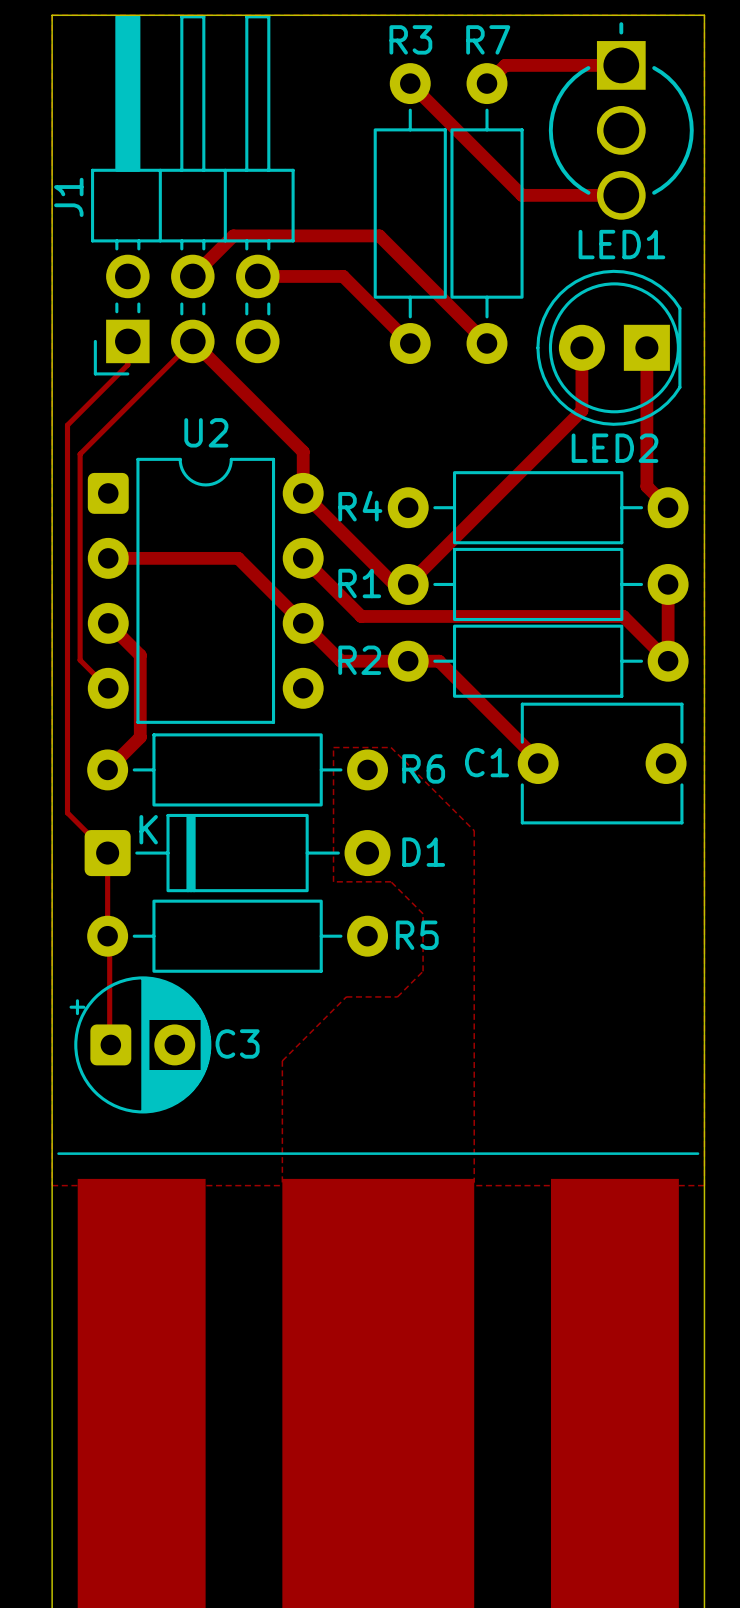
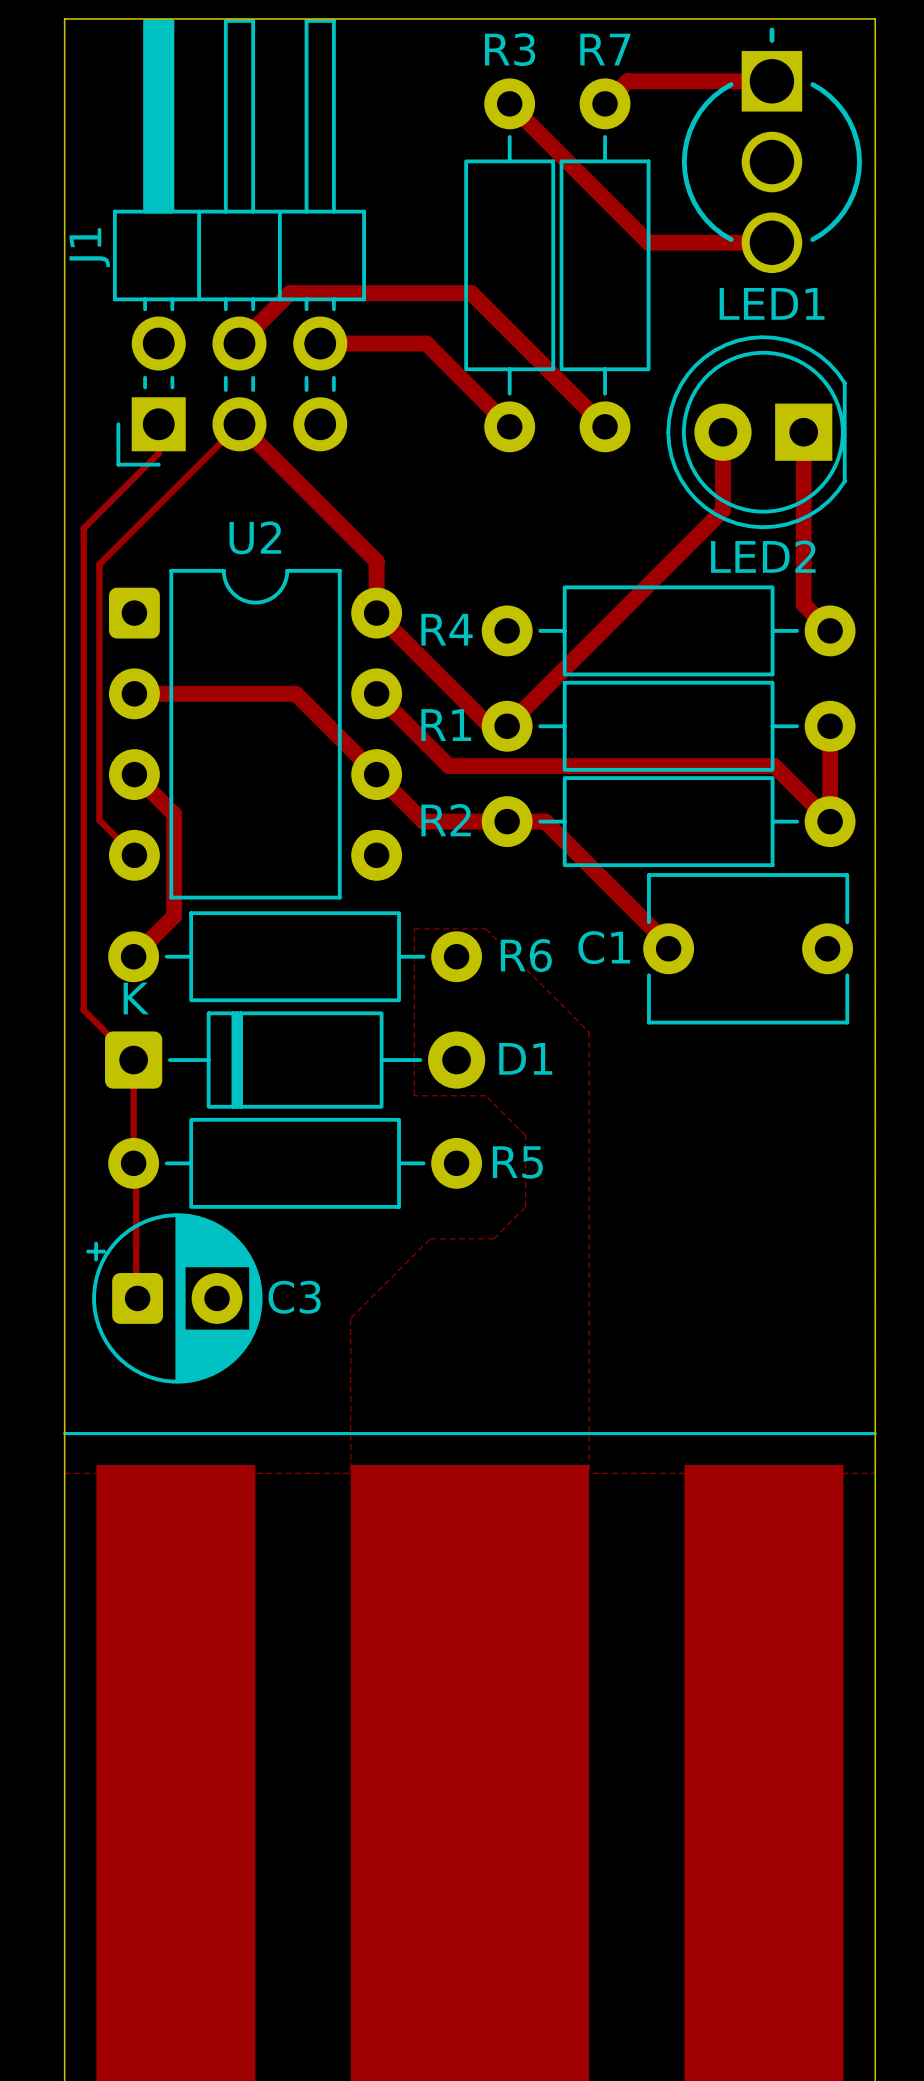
D1 text position: K (148, 829) -> K (136, 998)
line: none -> (64, 1433) (72, 1433)
line: none -> (867, 1433) (875, 1433)

